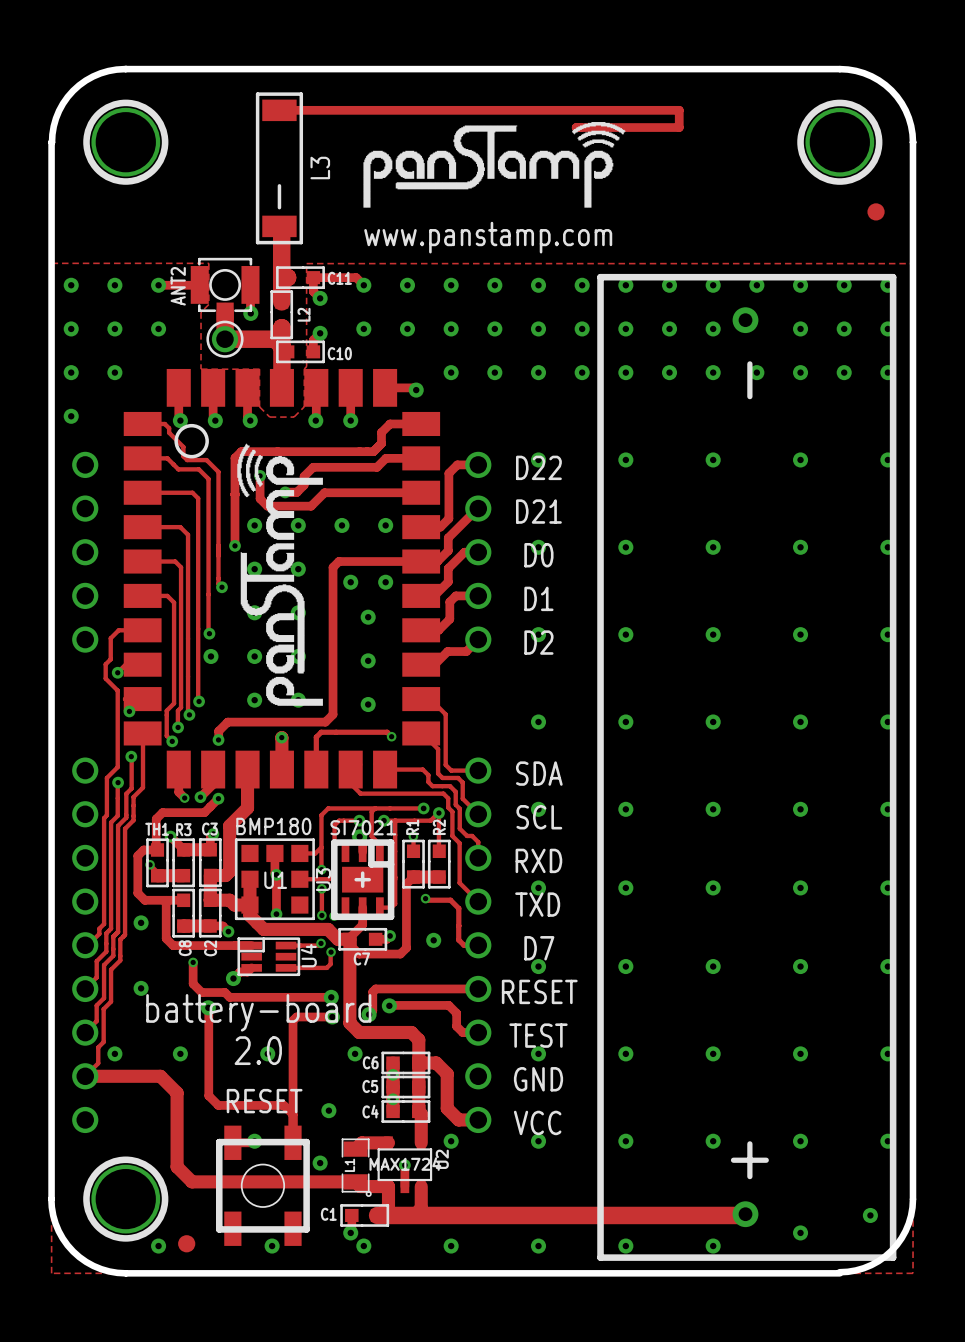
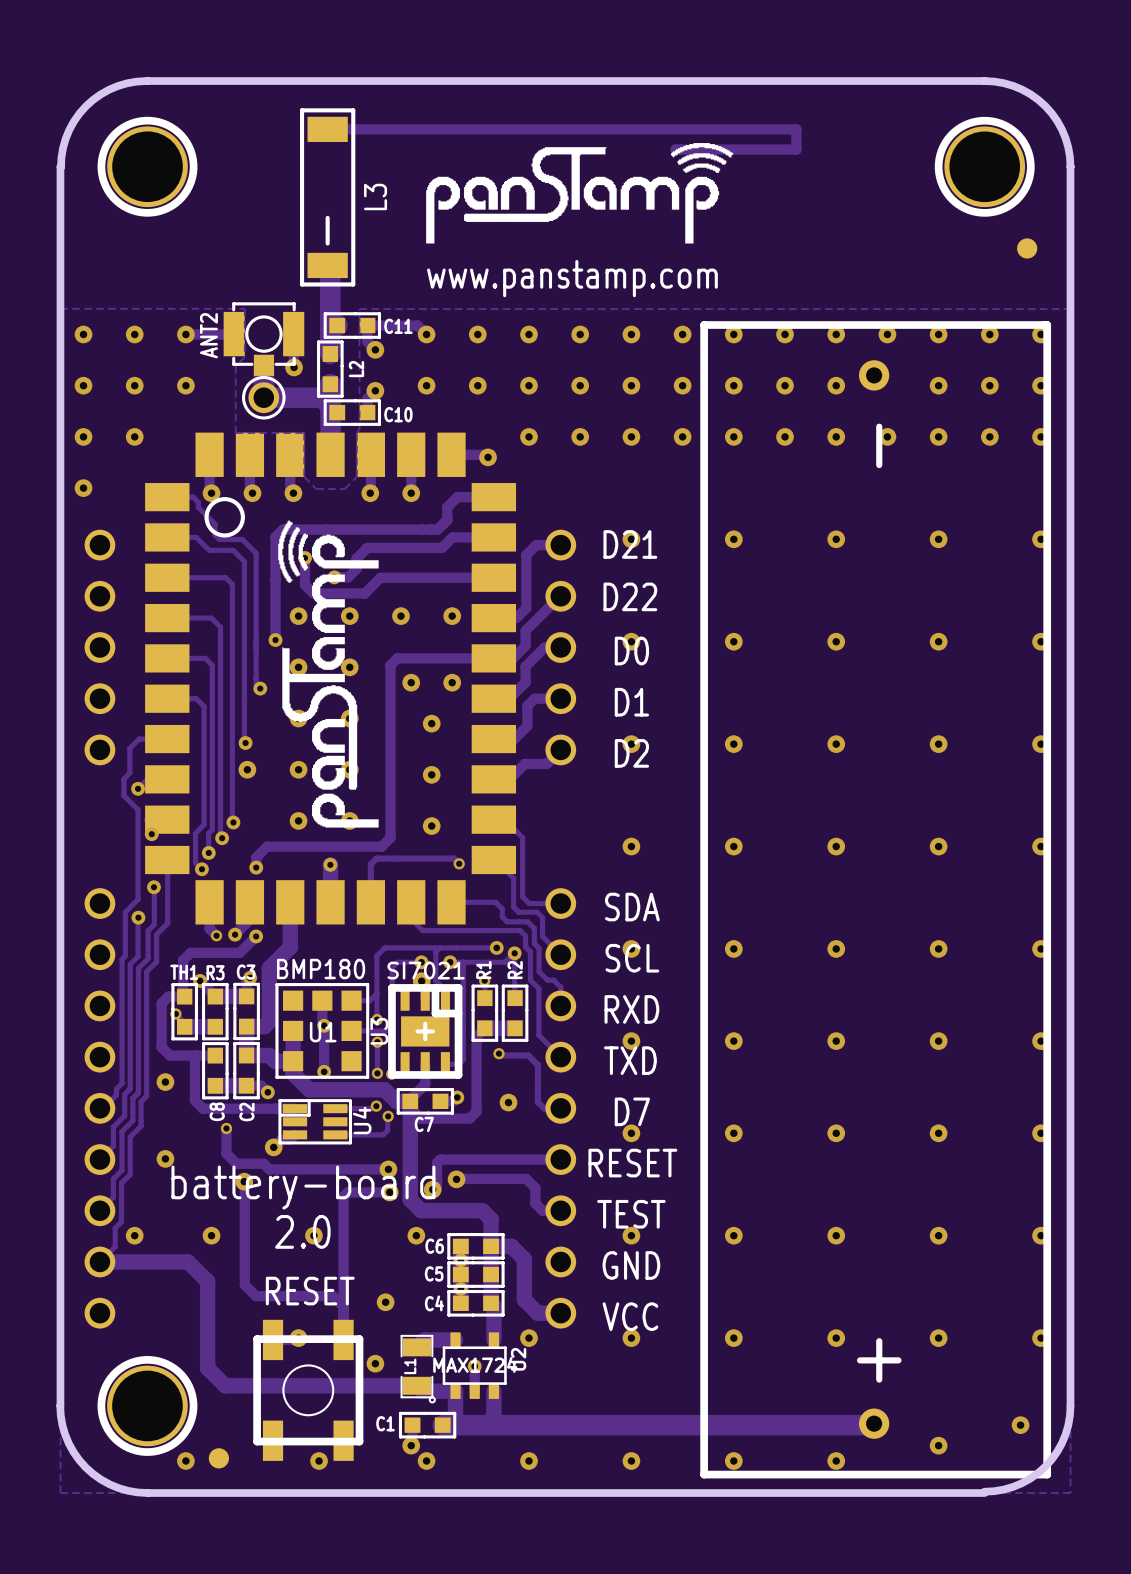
text position: D22 (538, 467) -> D22 (630, 596)
text position: D21 (538, 511) -> D21 (630, 544)

